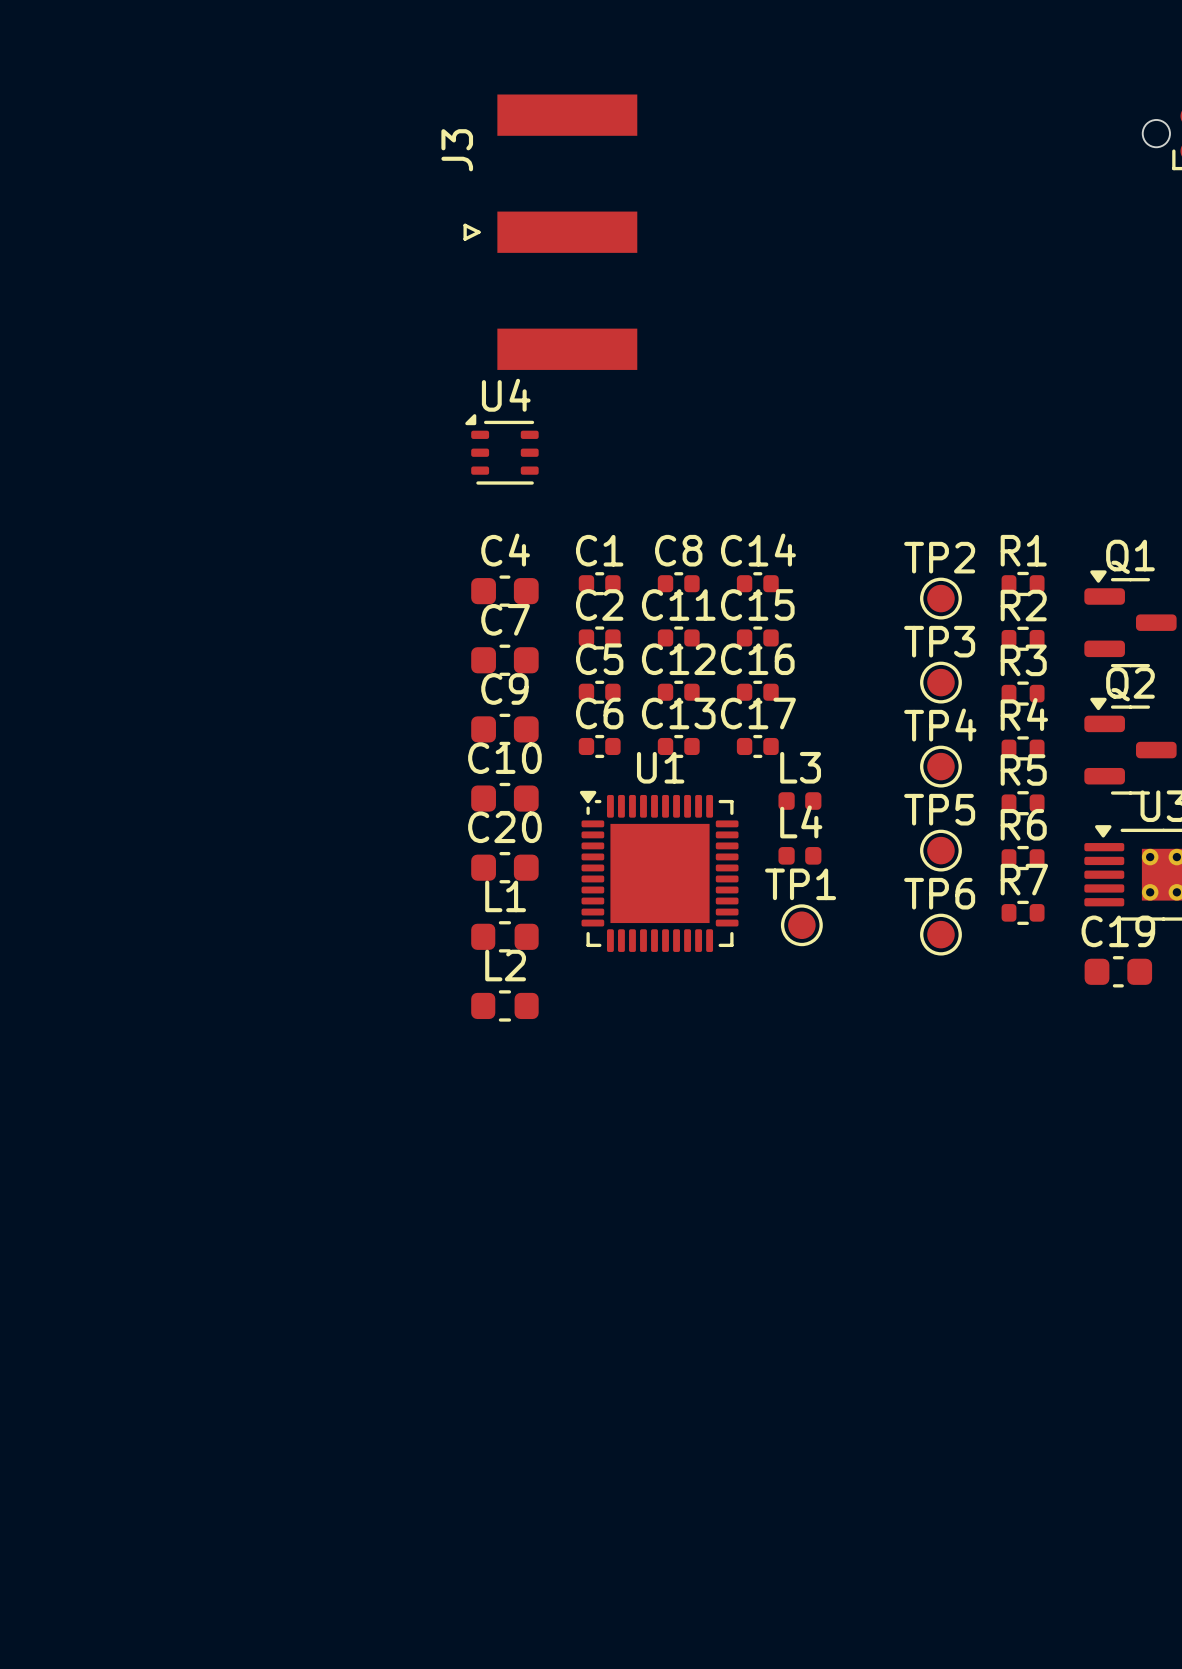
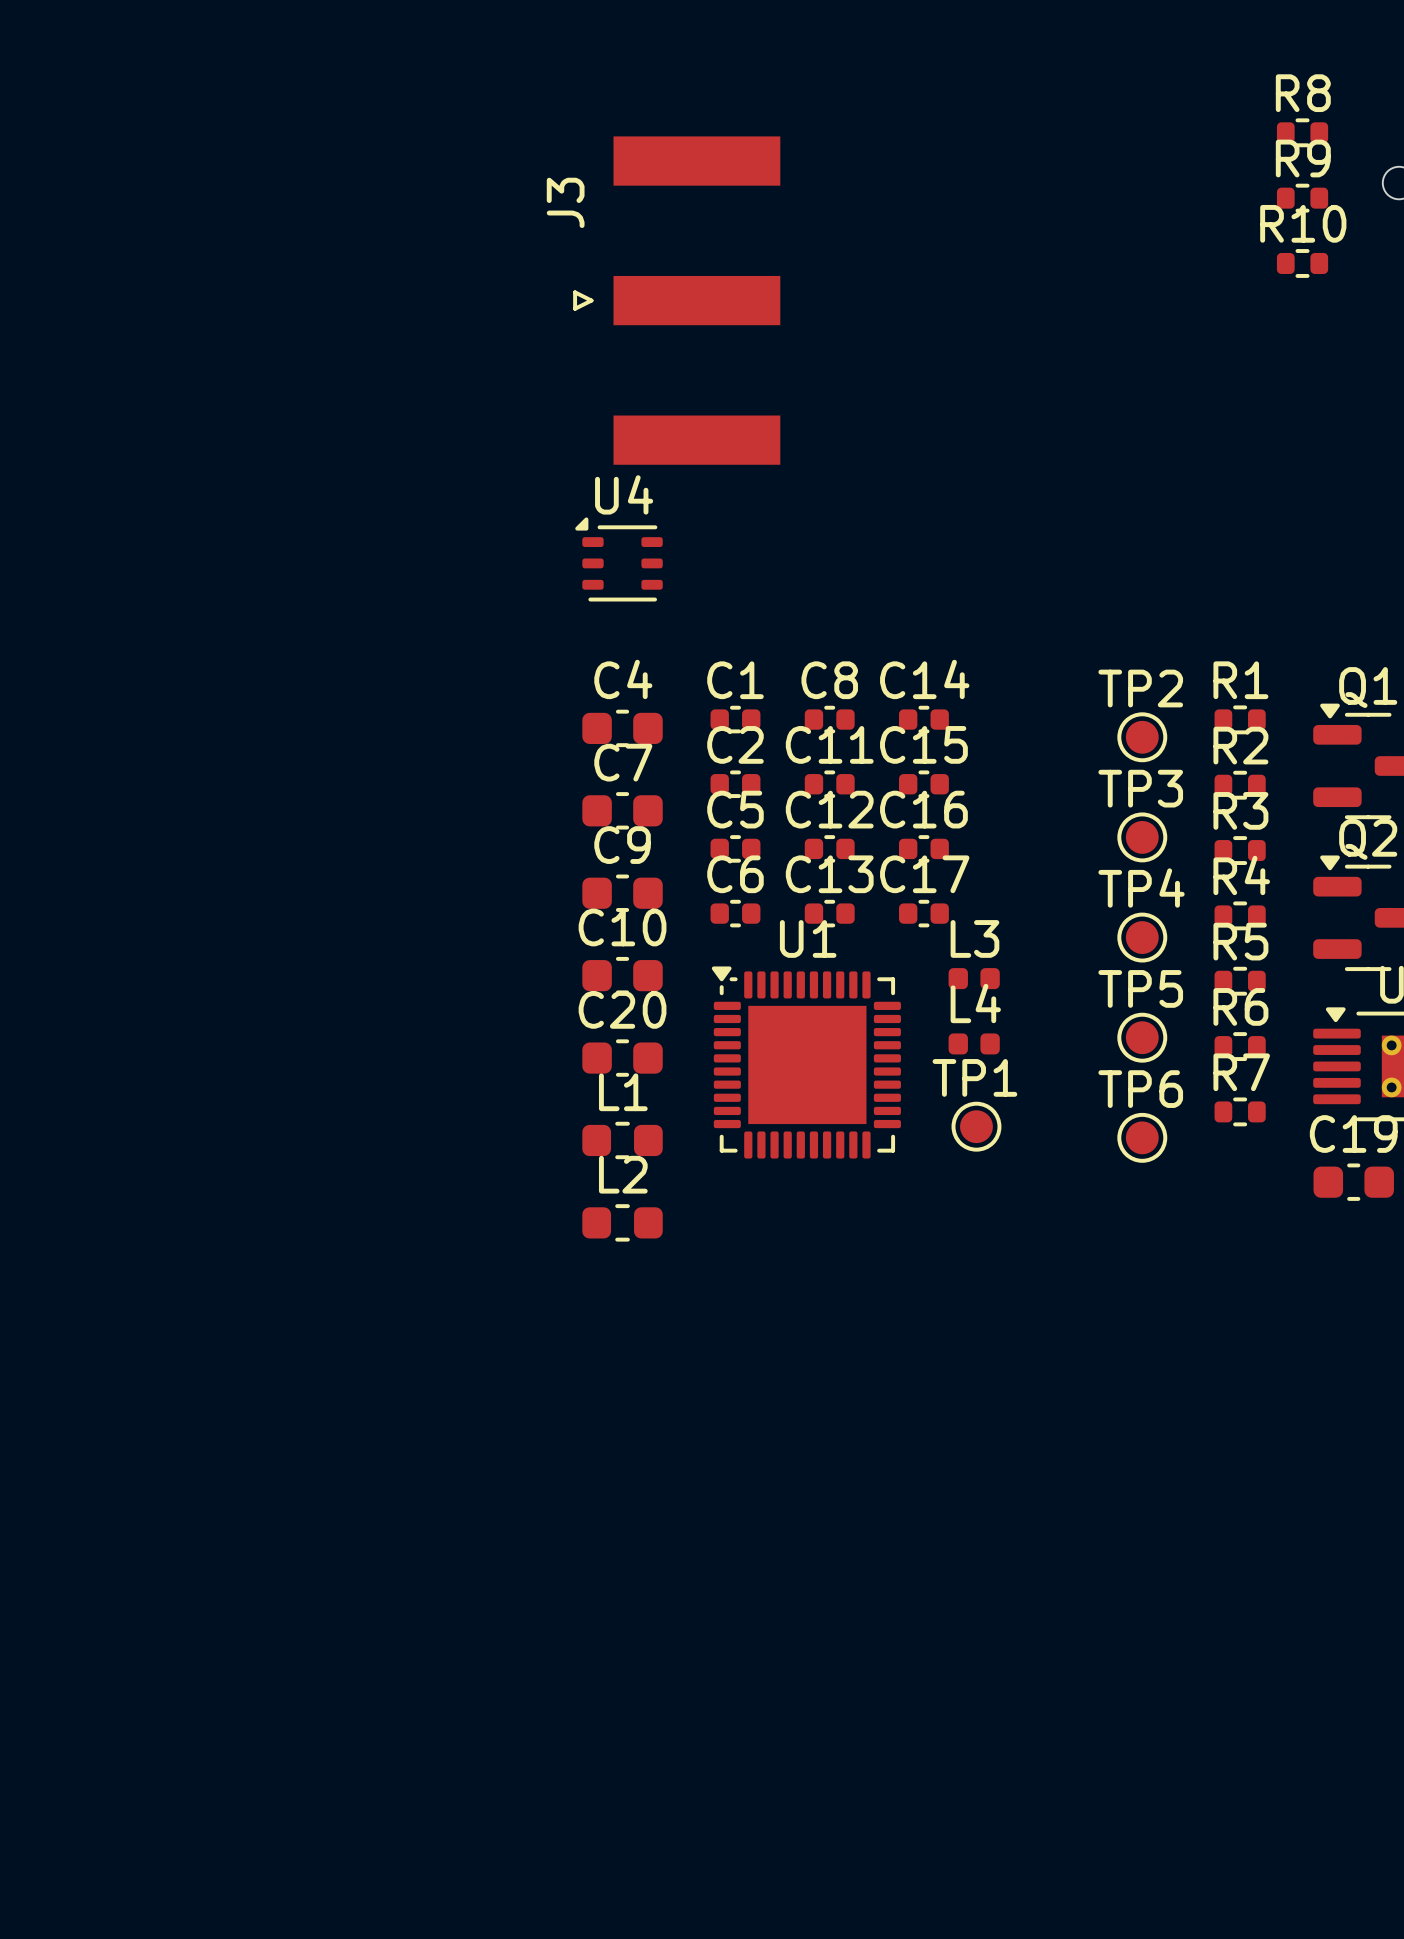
R8: none -> (1302, 132)
R9: none -> (1302, 198)
R10: none -> (1302, 263)

